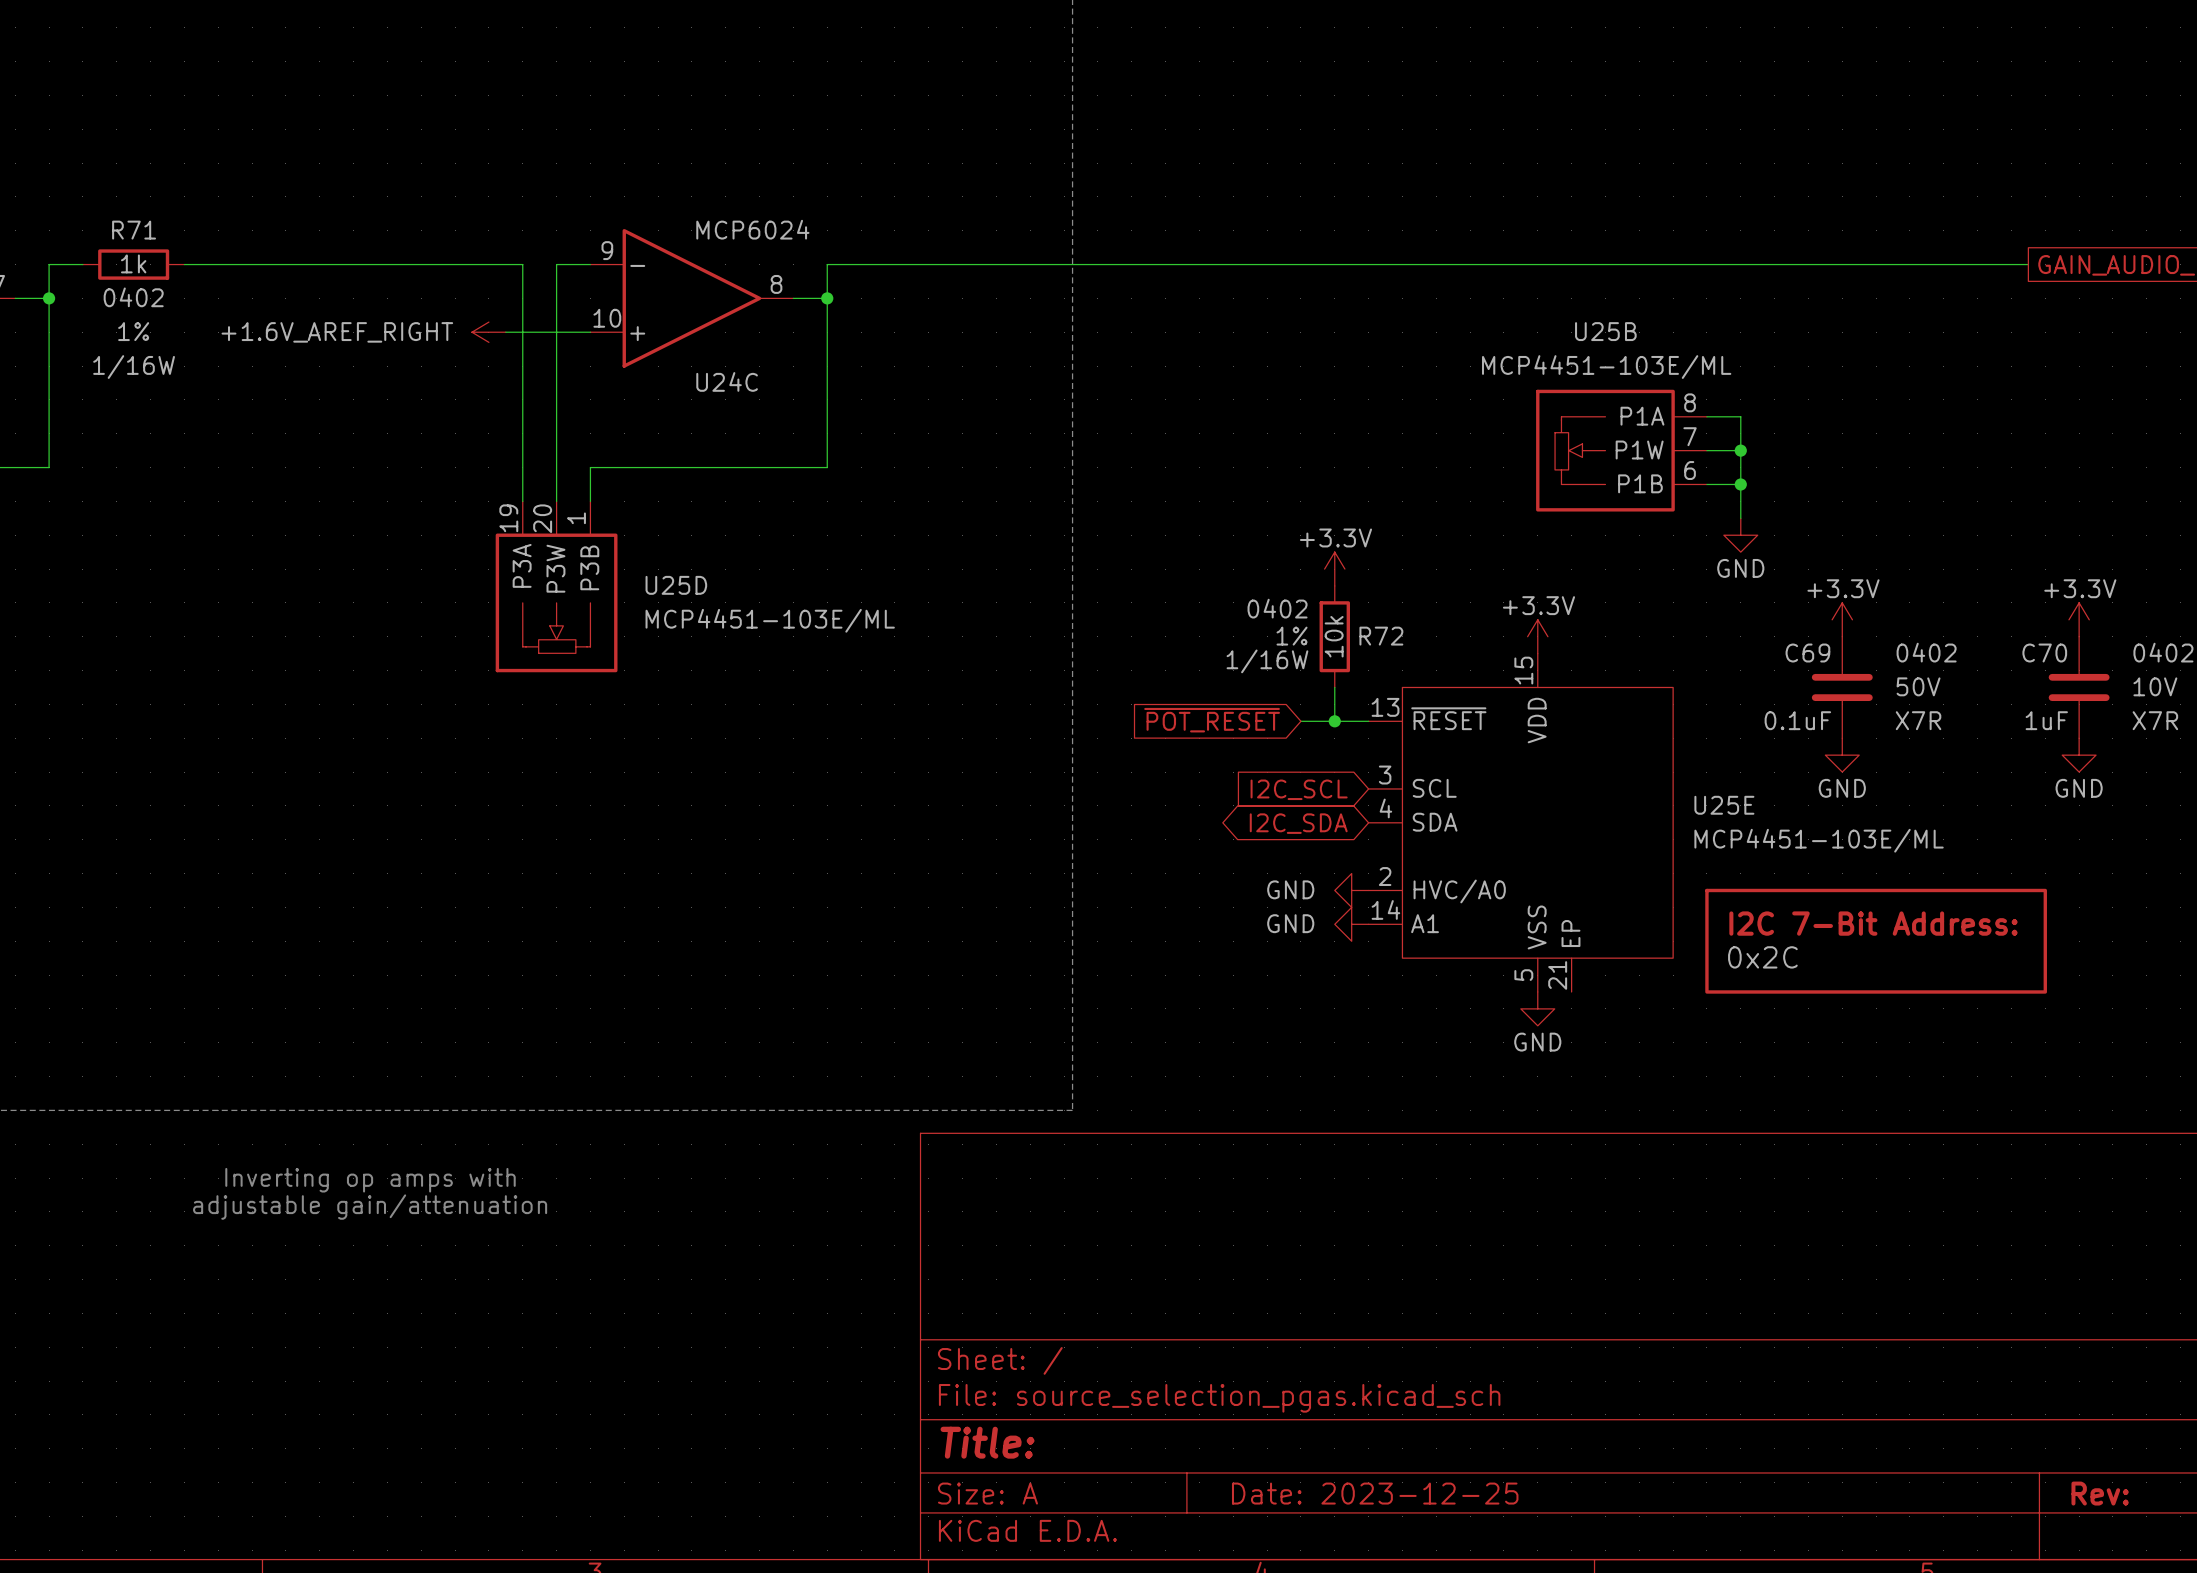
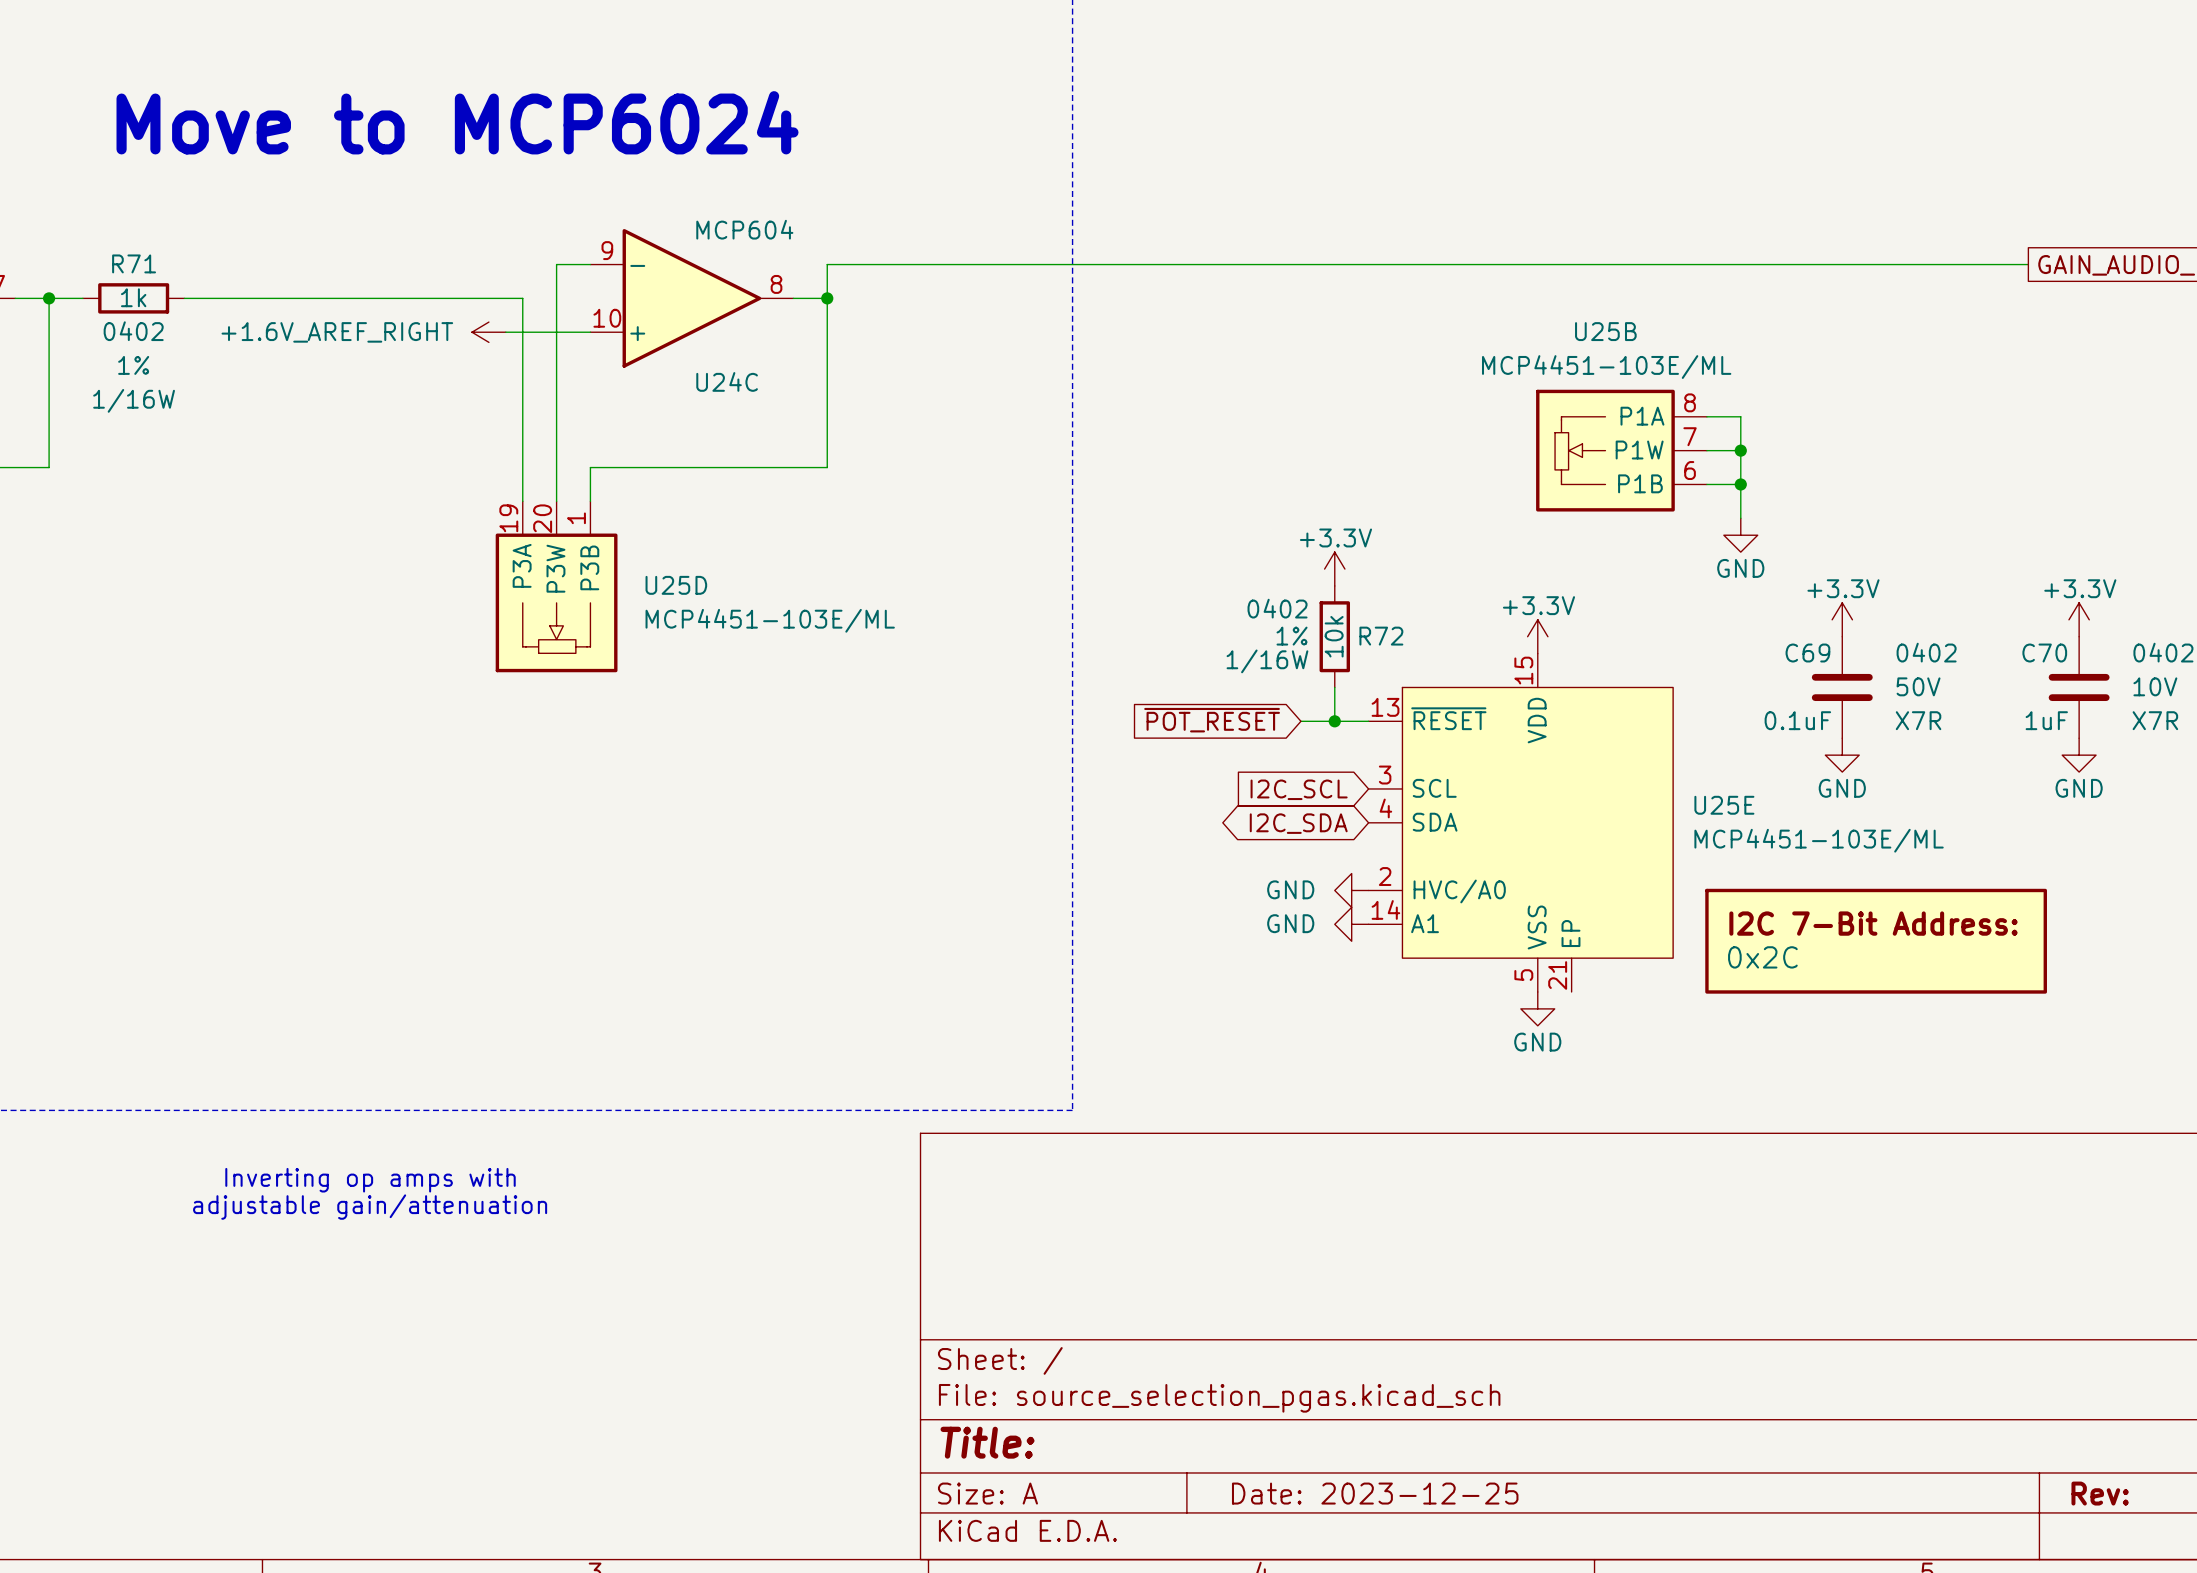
text: none -> Move to MCP6024 (457, 122)
U24C value: MCP6024 (752, 229) -> MCP604 (744, 229)
wire: (82, 264) (49, 264) (49, 298) -> (82, 298) (49, 298)
R71 position: (133, 264) -> (133, 298)
wire: (184, 264) (522, 264) (522, 298) -> (184, 298) (522, 298)

